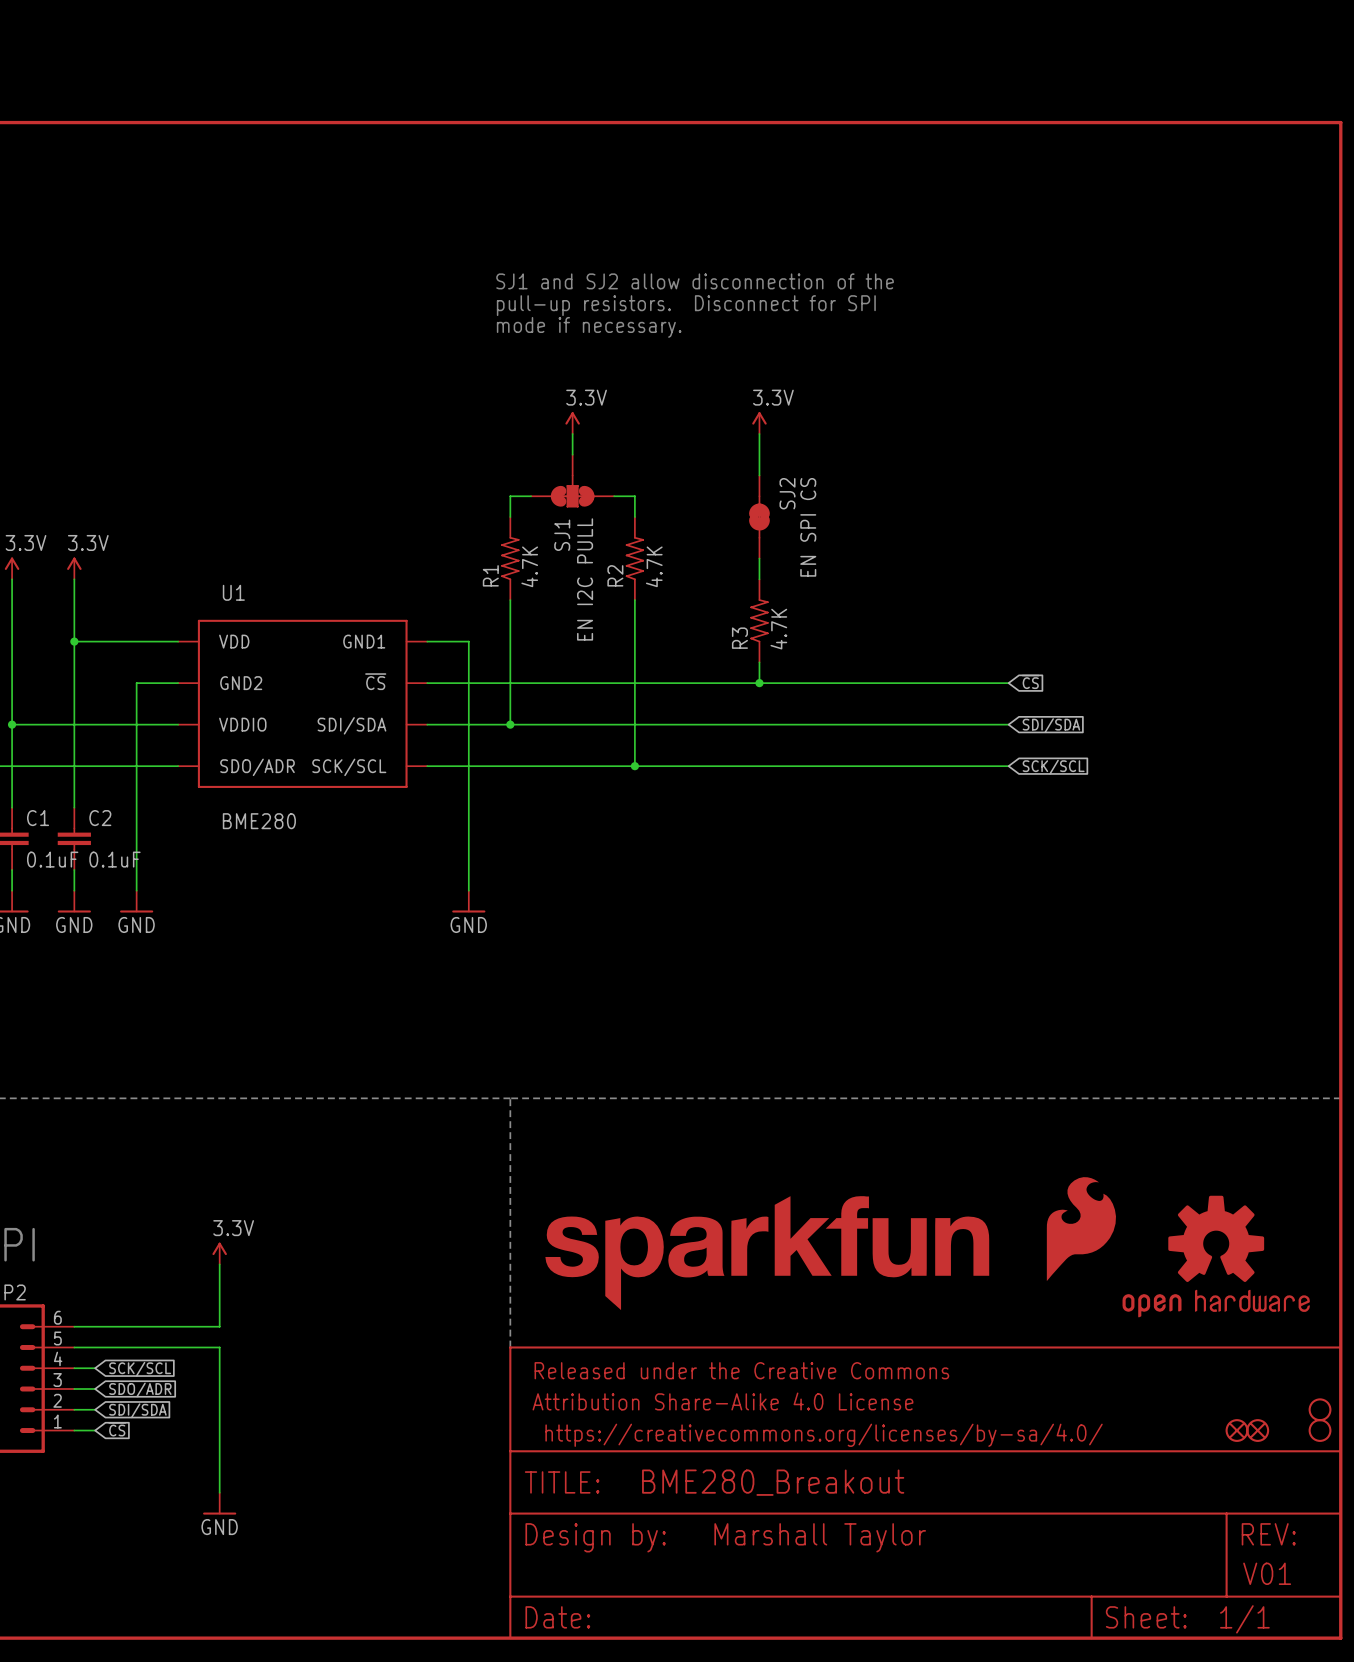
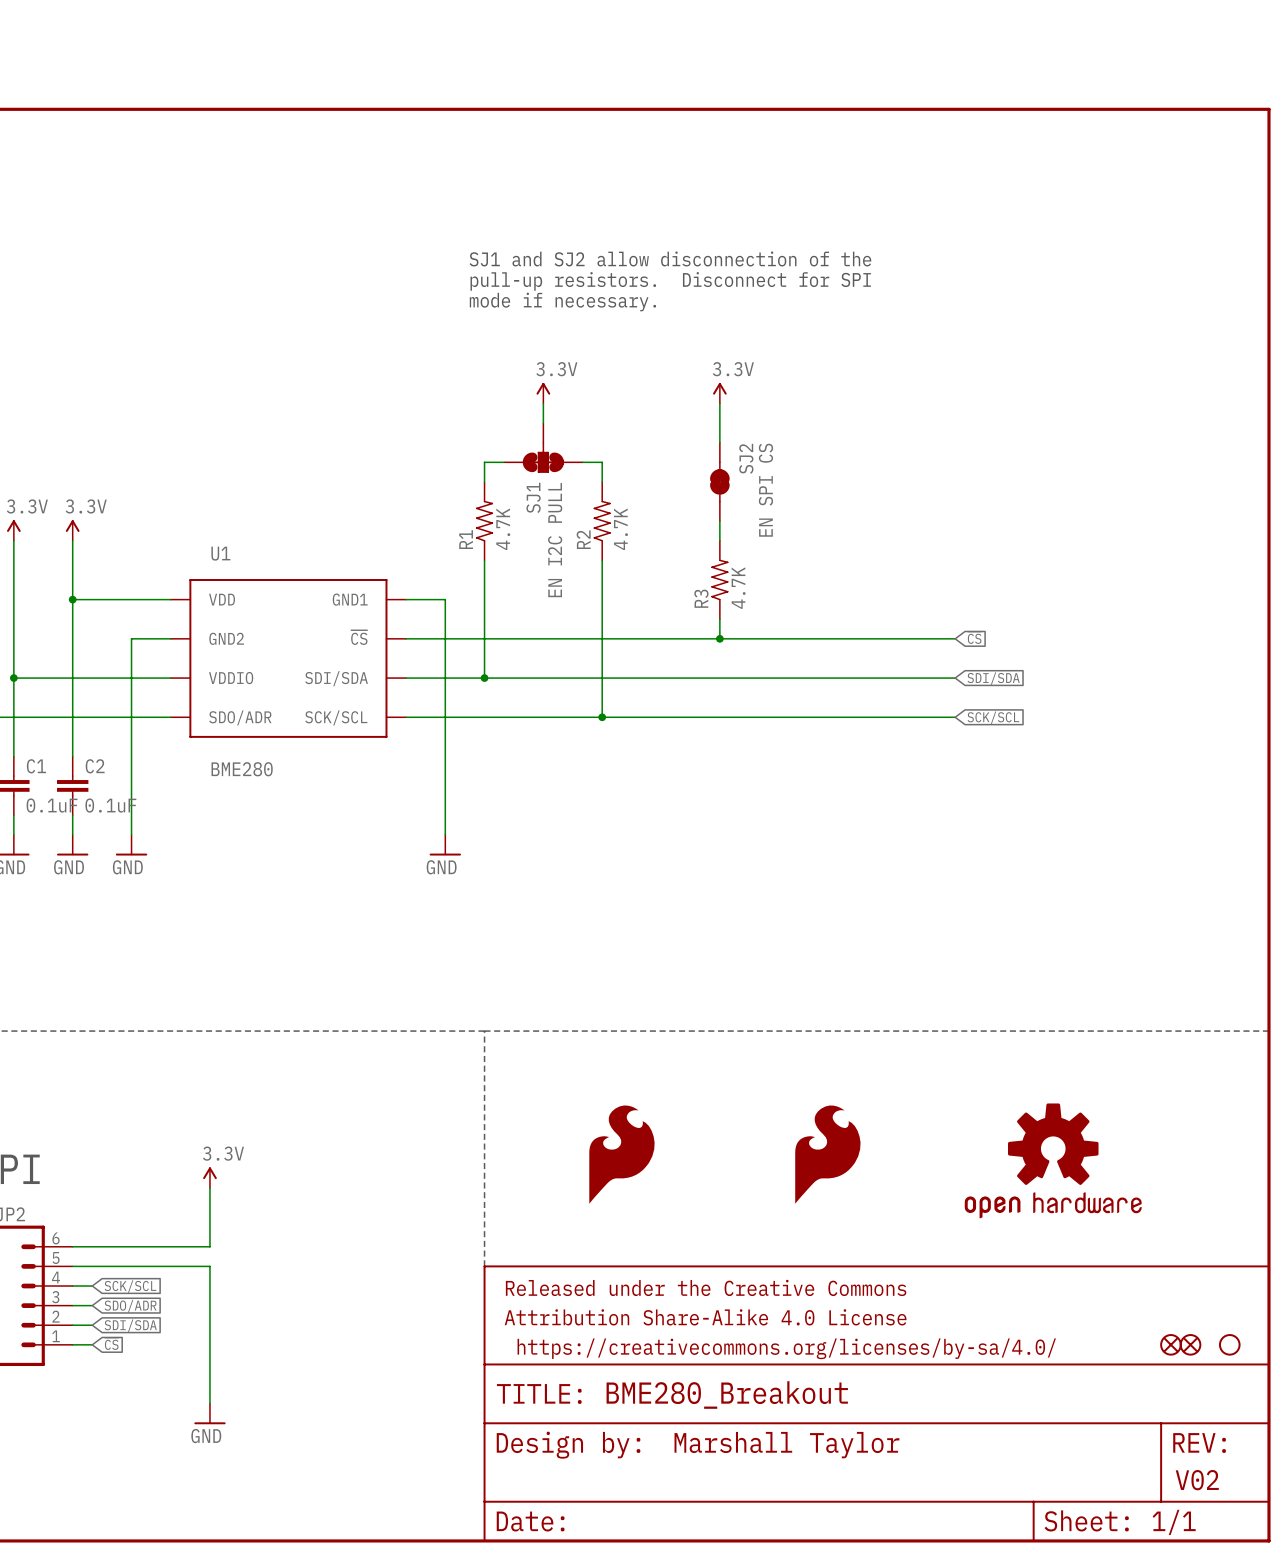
part: none -> (621, 1154)
part: none -> (827, 1154)
part: (1081, 1229) -> none
part: (767, 1253) -> none
part position: (1216, 1256) -> (1053, 1160)
part: (1320, 1409) -> none
part: none -> (1229, 1344)
part: (1320, 1430) -> none
text: V01 (1267, 1573) -> V02 (1197, 1480)

